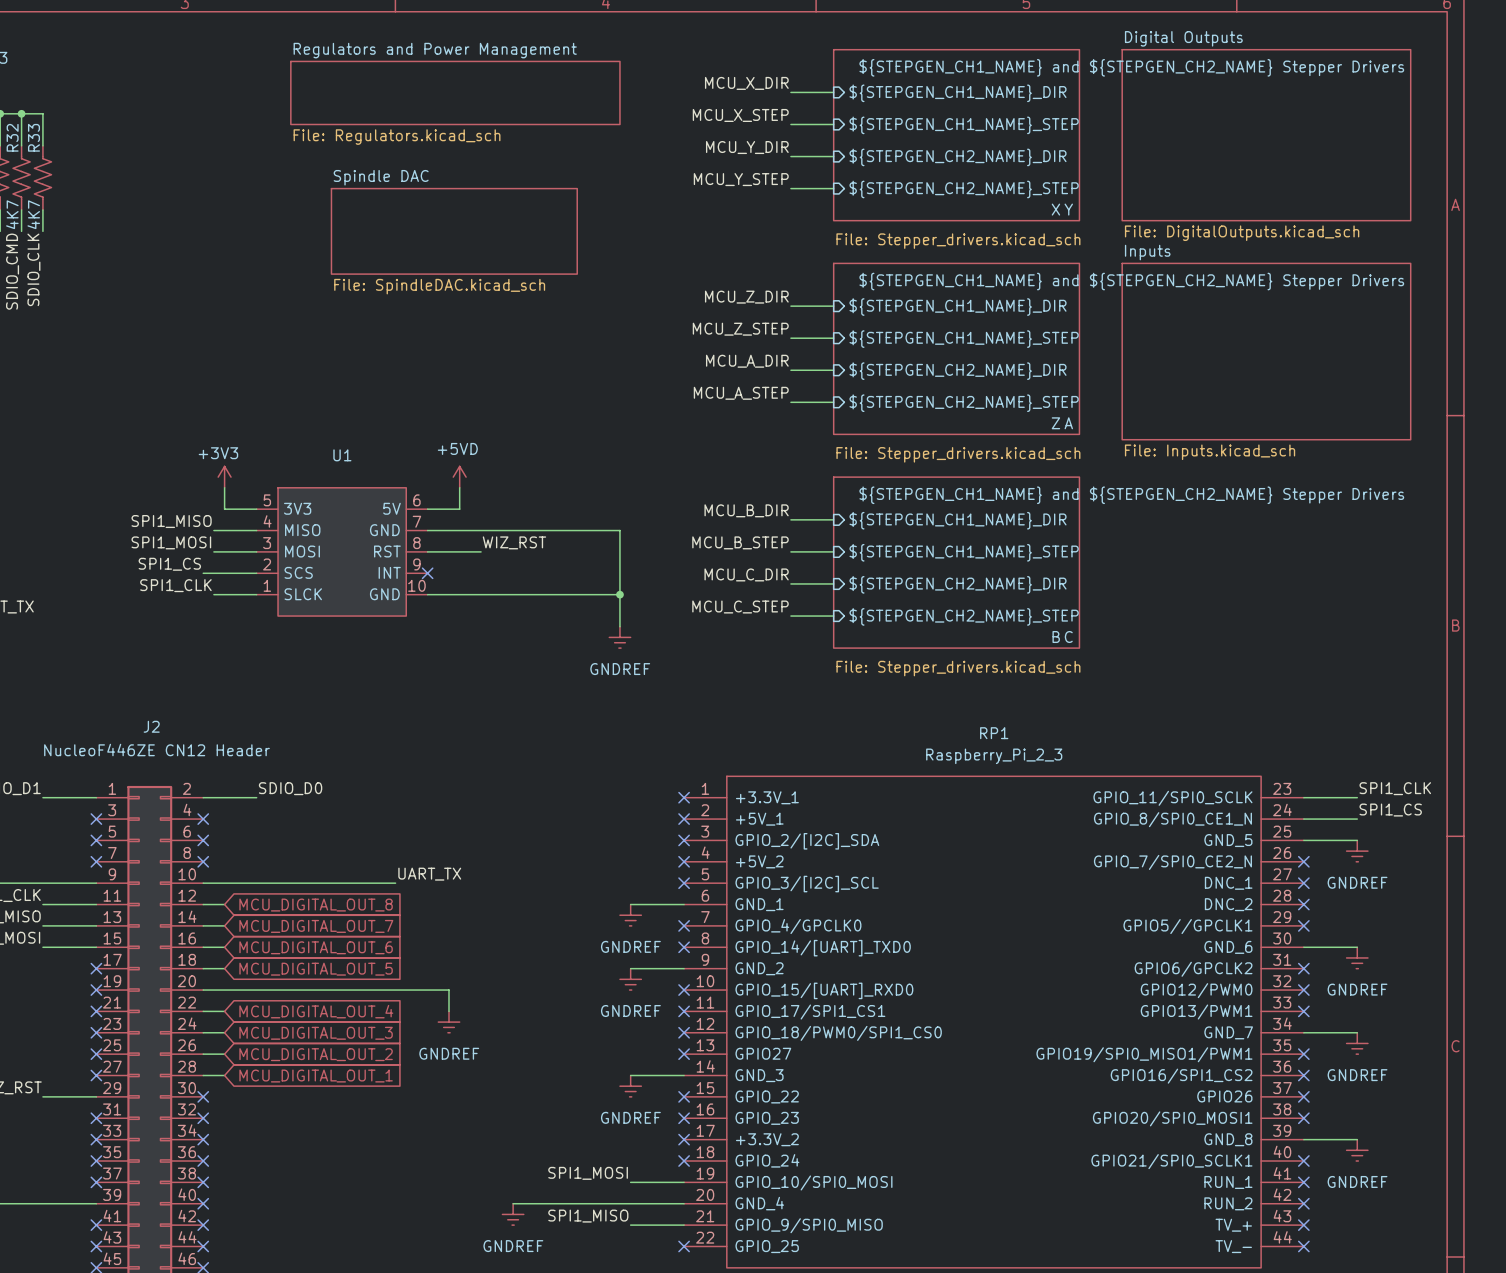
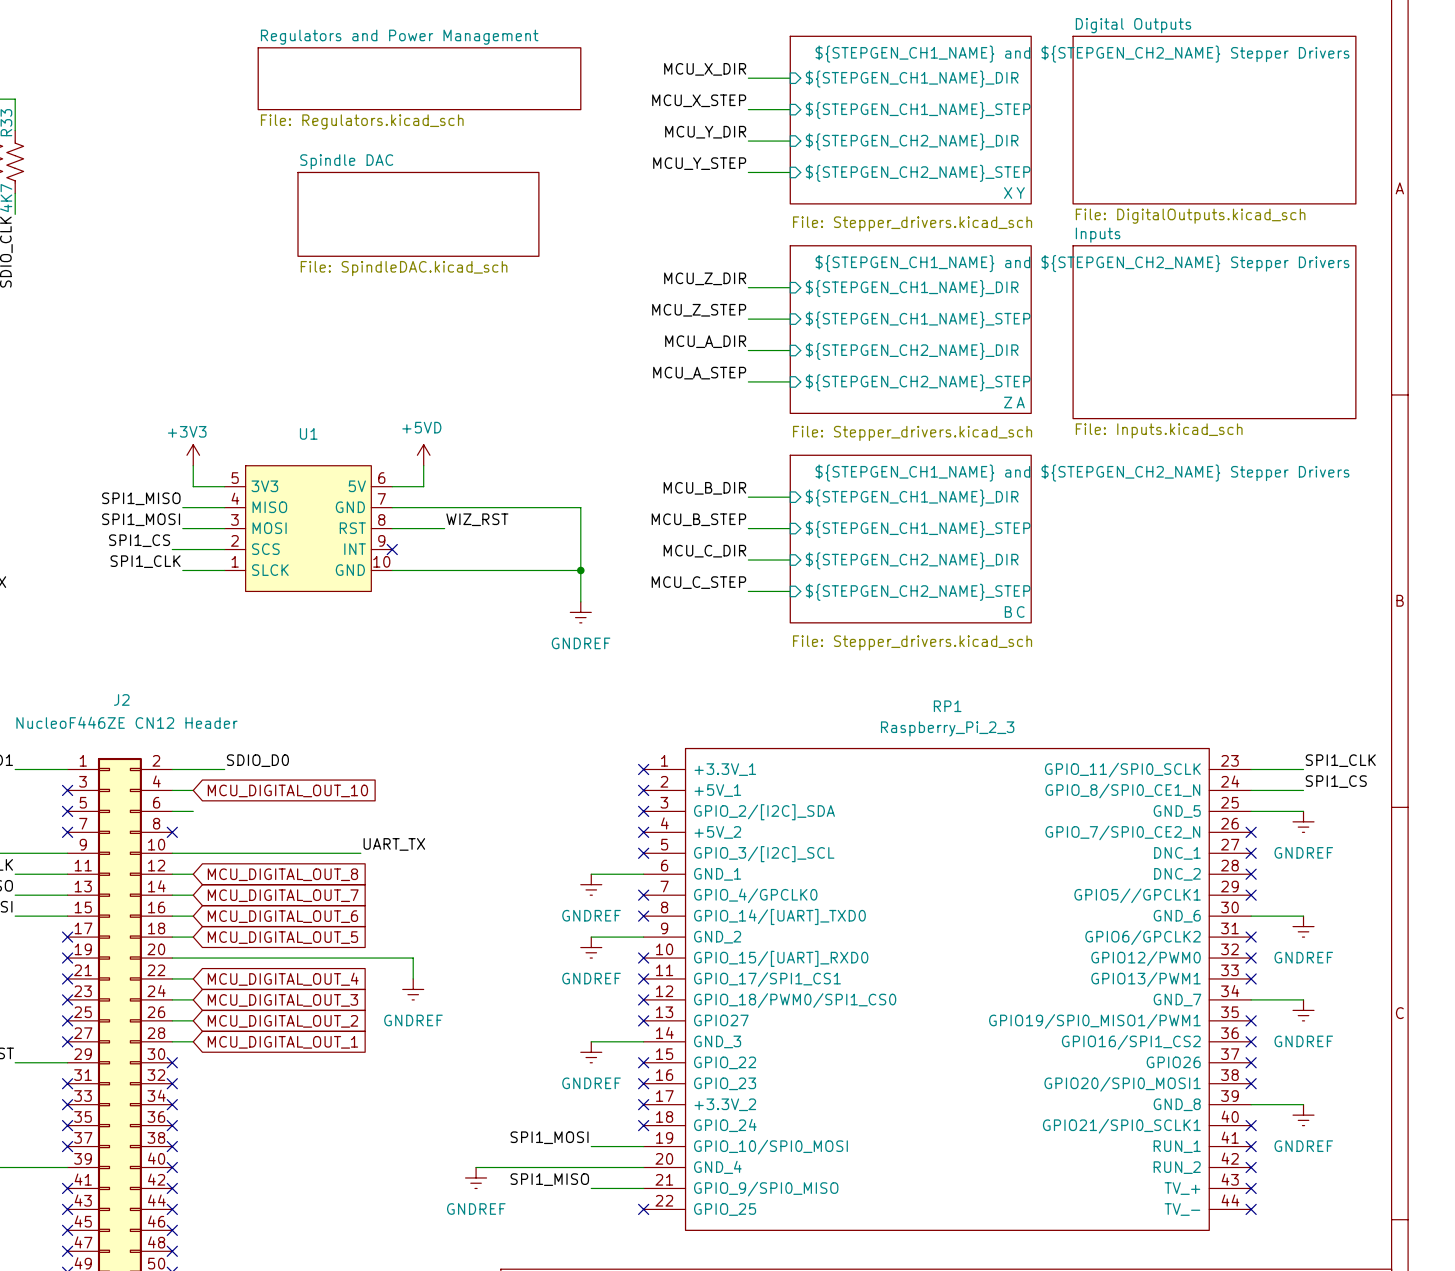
wire: none -> (172, 790) (193, 790)
no-connect mark: (203, 819) -> none
global label: none -> MCU_DIGITAL_OUT_10 (287, 790)
wire: none -> (172, 811) (193, 811)
no-connect mark: (203, 840) -> none

